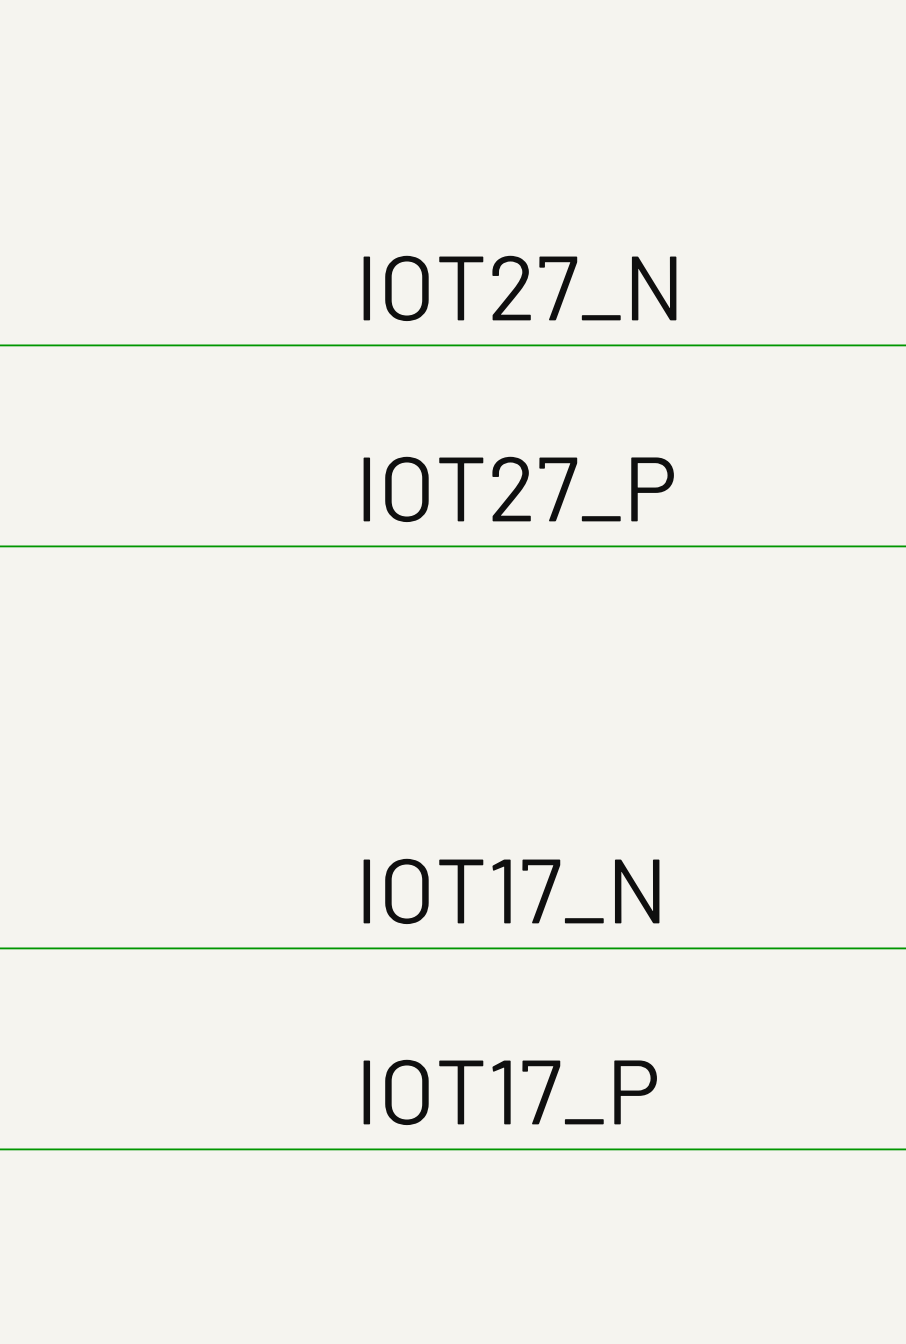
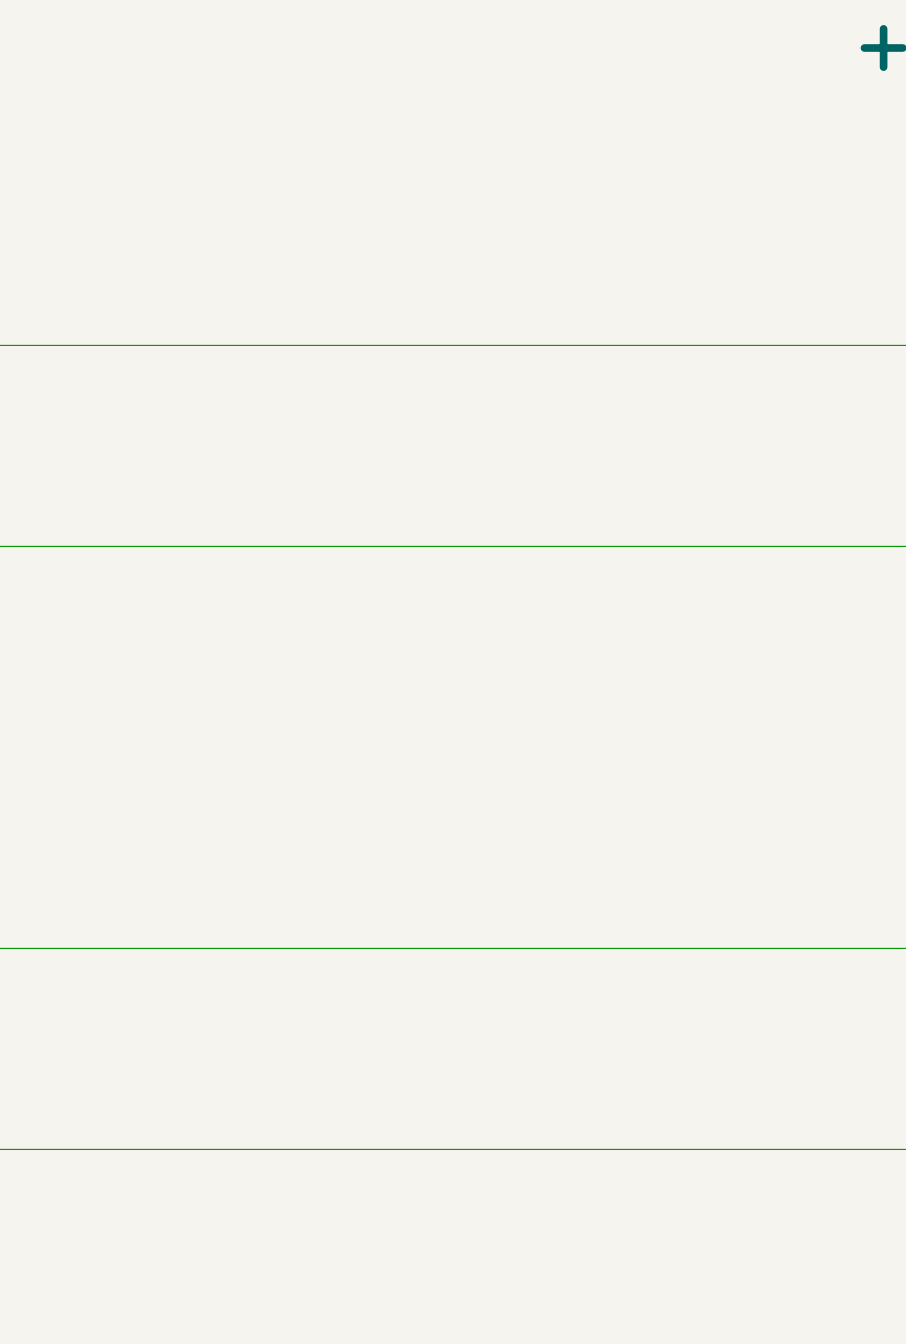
label: IOT27_N (519, 288) -> none
label: IOT27_P (518, 489) -> none
label: IOT17_N (511, 891) -> none
label: IOT17_P (510, 1092) -> none

